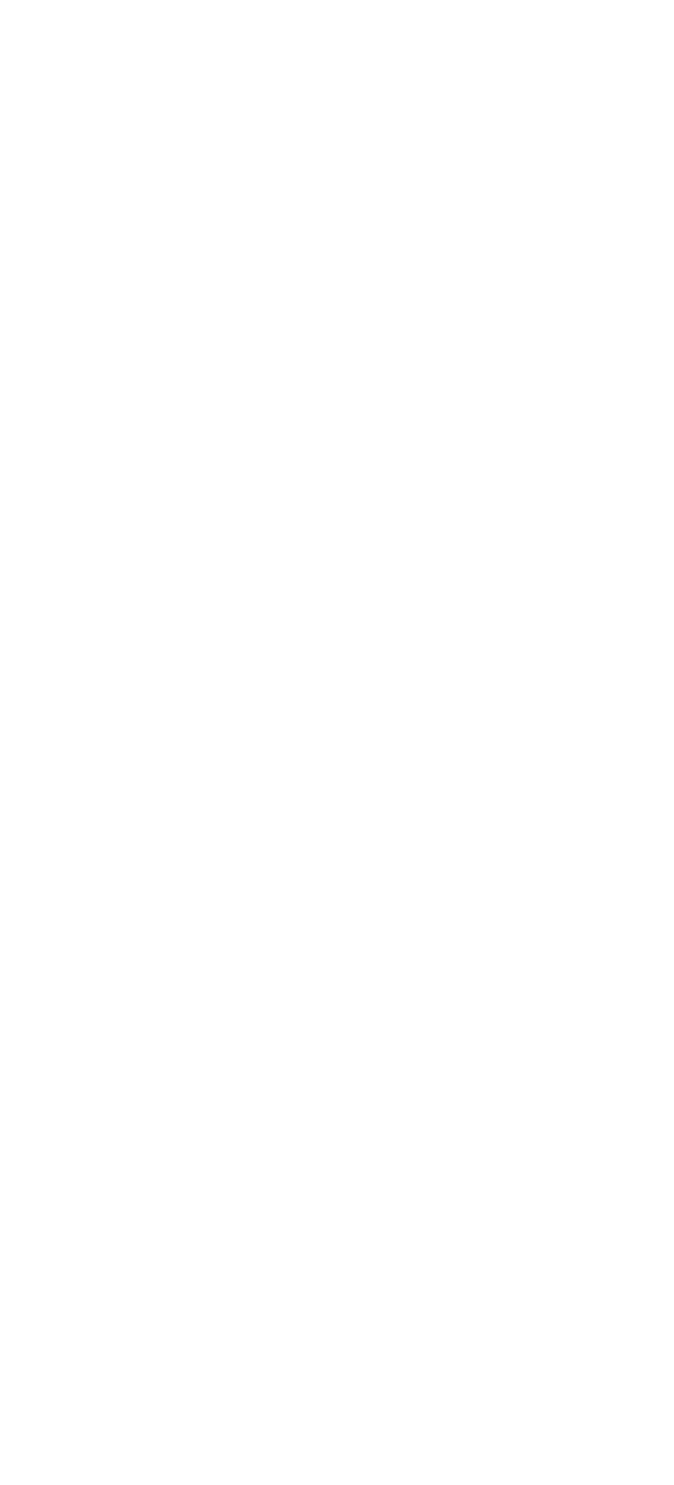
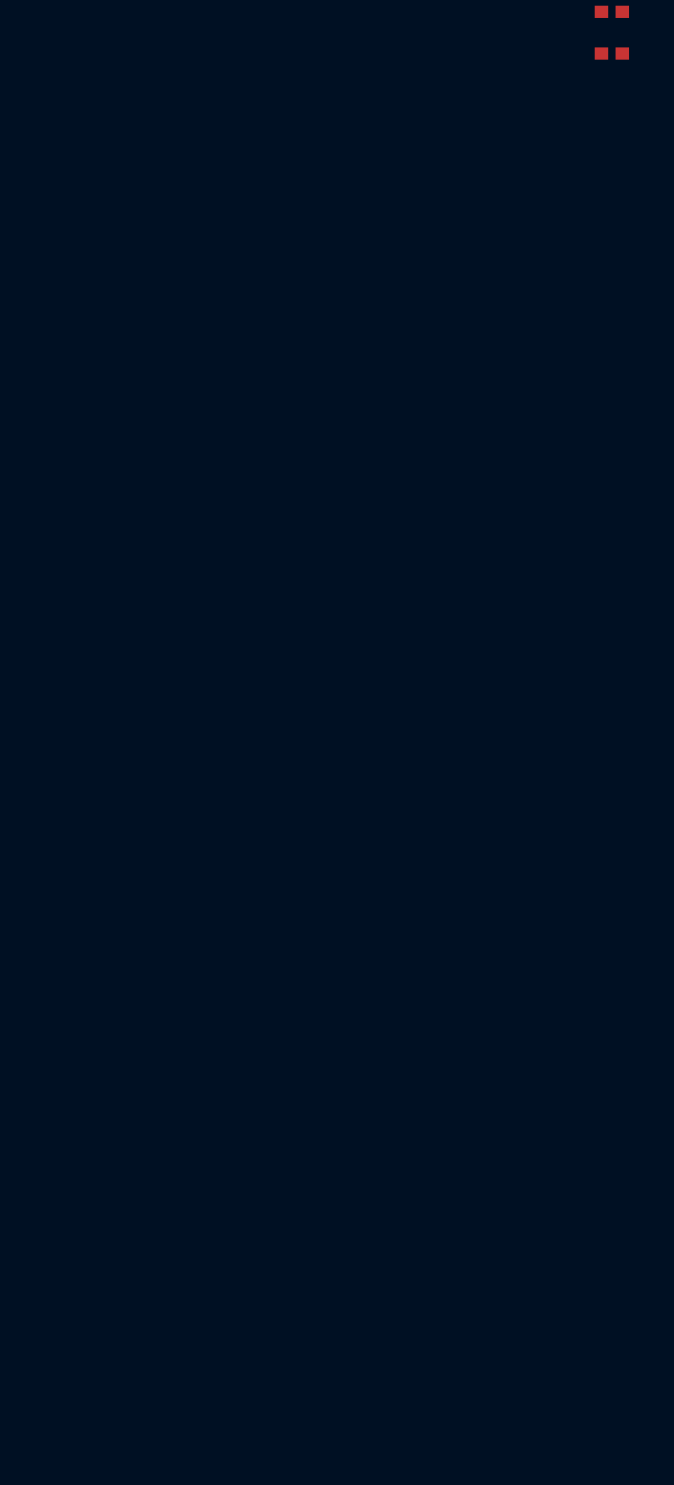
part: none -> (611, 11)
part: none -> (611, 53)

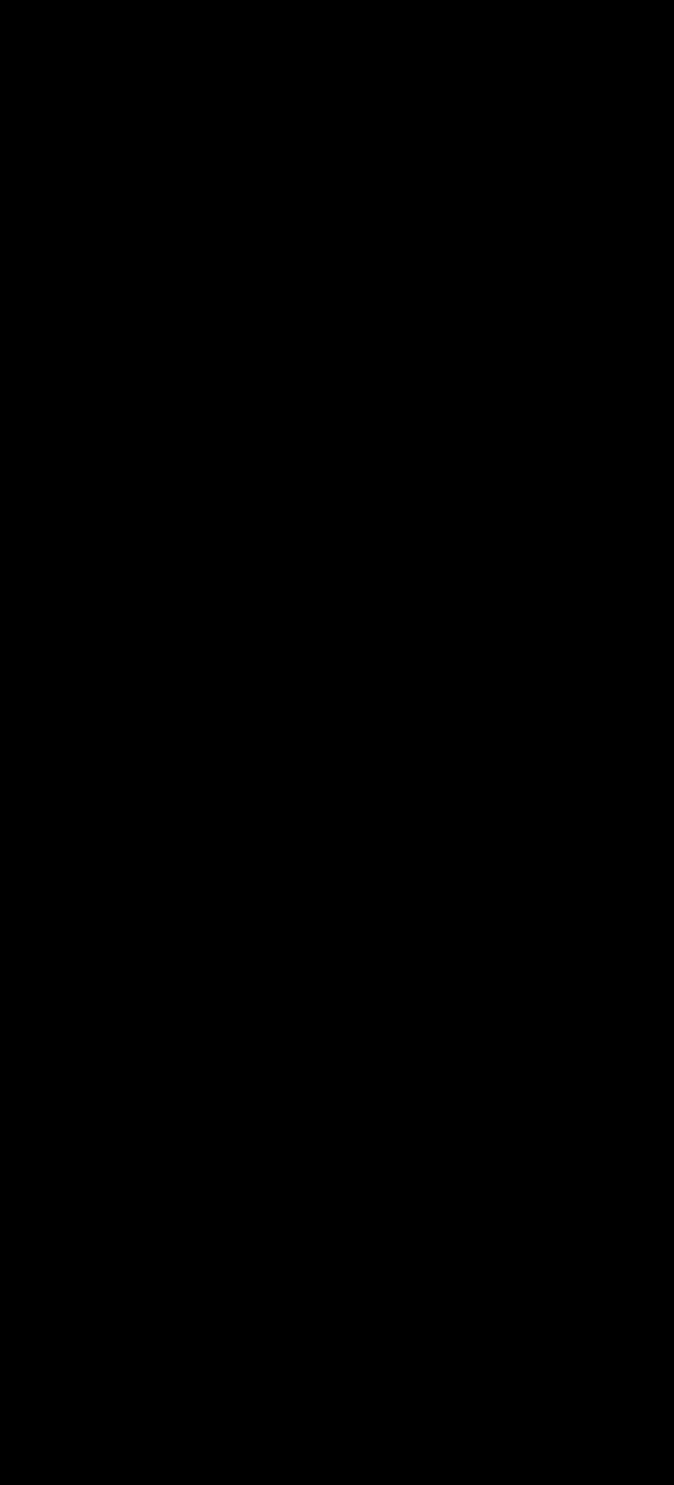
part: (611, 11) -> none
part: (611, 53) -> none

